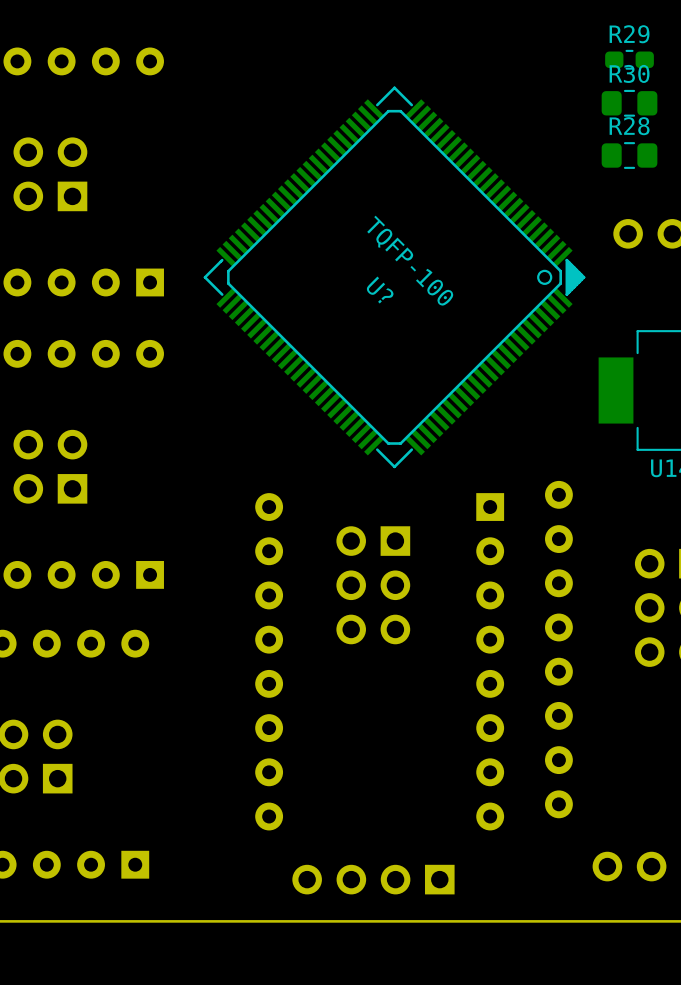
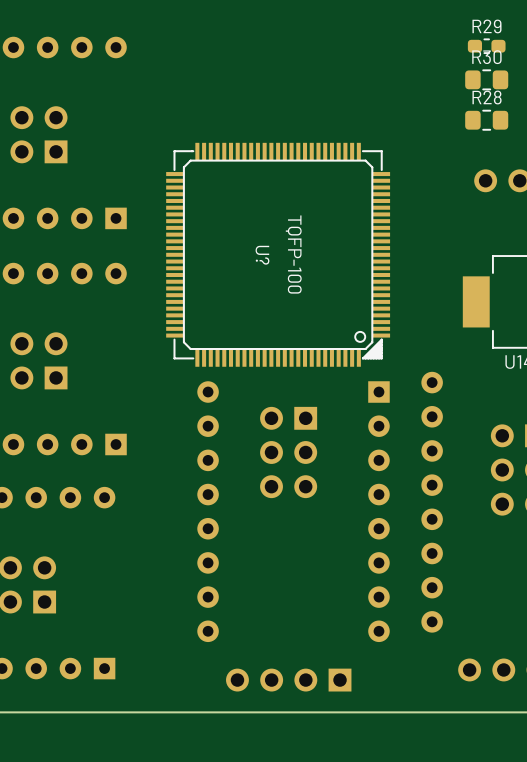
U?: TQFP-100 (394, 277) -> none
U?: none -> TQFP-100 (278, 254)

